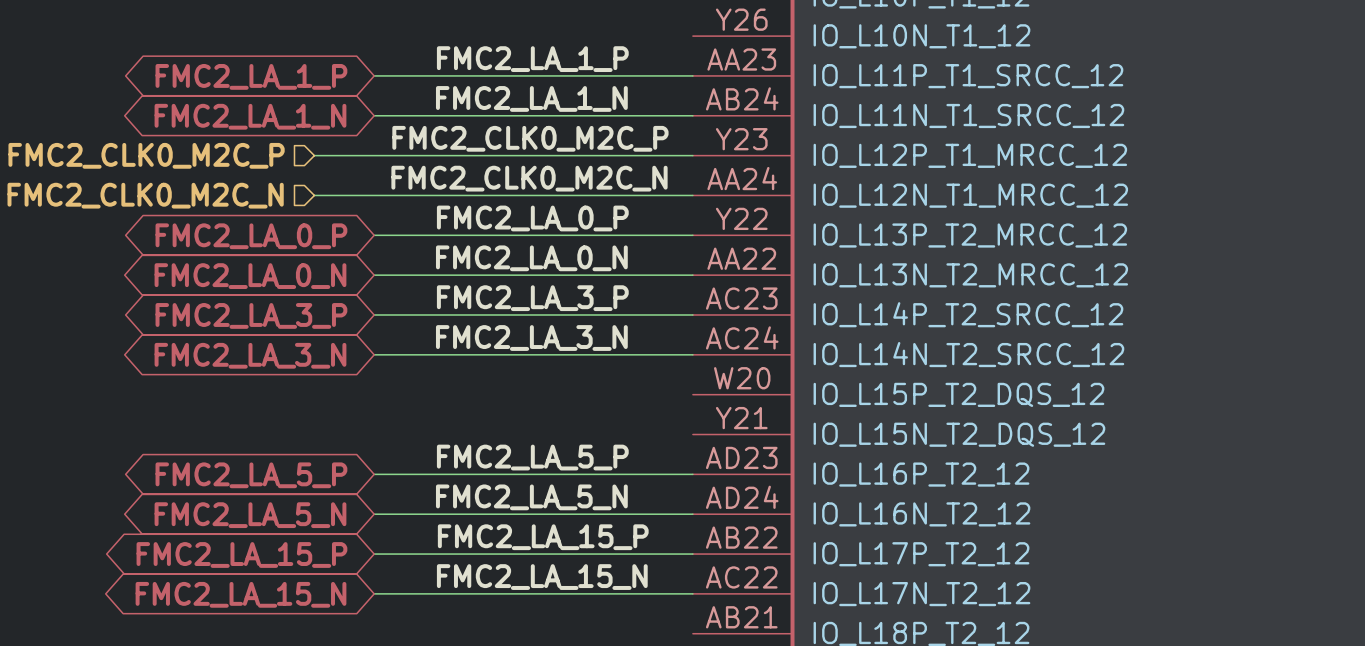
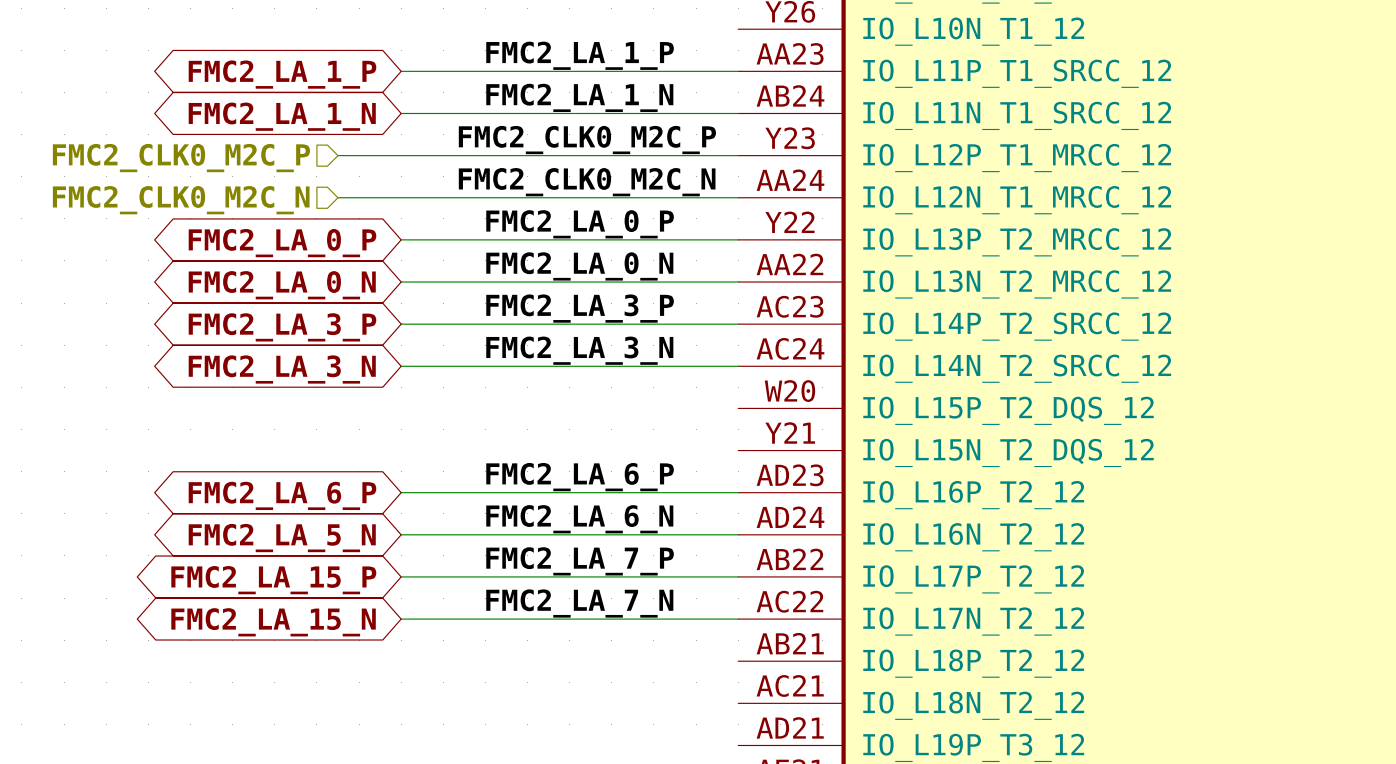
label: FMC2_LA_5_P (532, 457) -> FMC2_LA_6_P (580, 477)
global label: FMC2_LA_5_P (251, 475) -> FMC2_LA_6_P (282, 495)
label: FMC2_LA_5_N (531, 497) -> FMC2_LA_6_N (579, 519)
label: FMC2_LA_15_P (543, 537) -> FMC2_LA_7_P (580, 561)
label: FMC2_LA_15_N (542, 577) -> FMC2_LA_7_N (579, 603)

